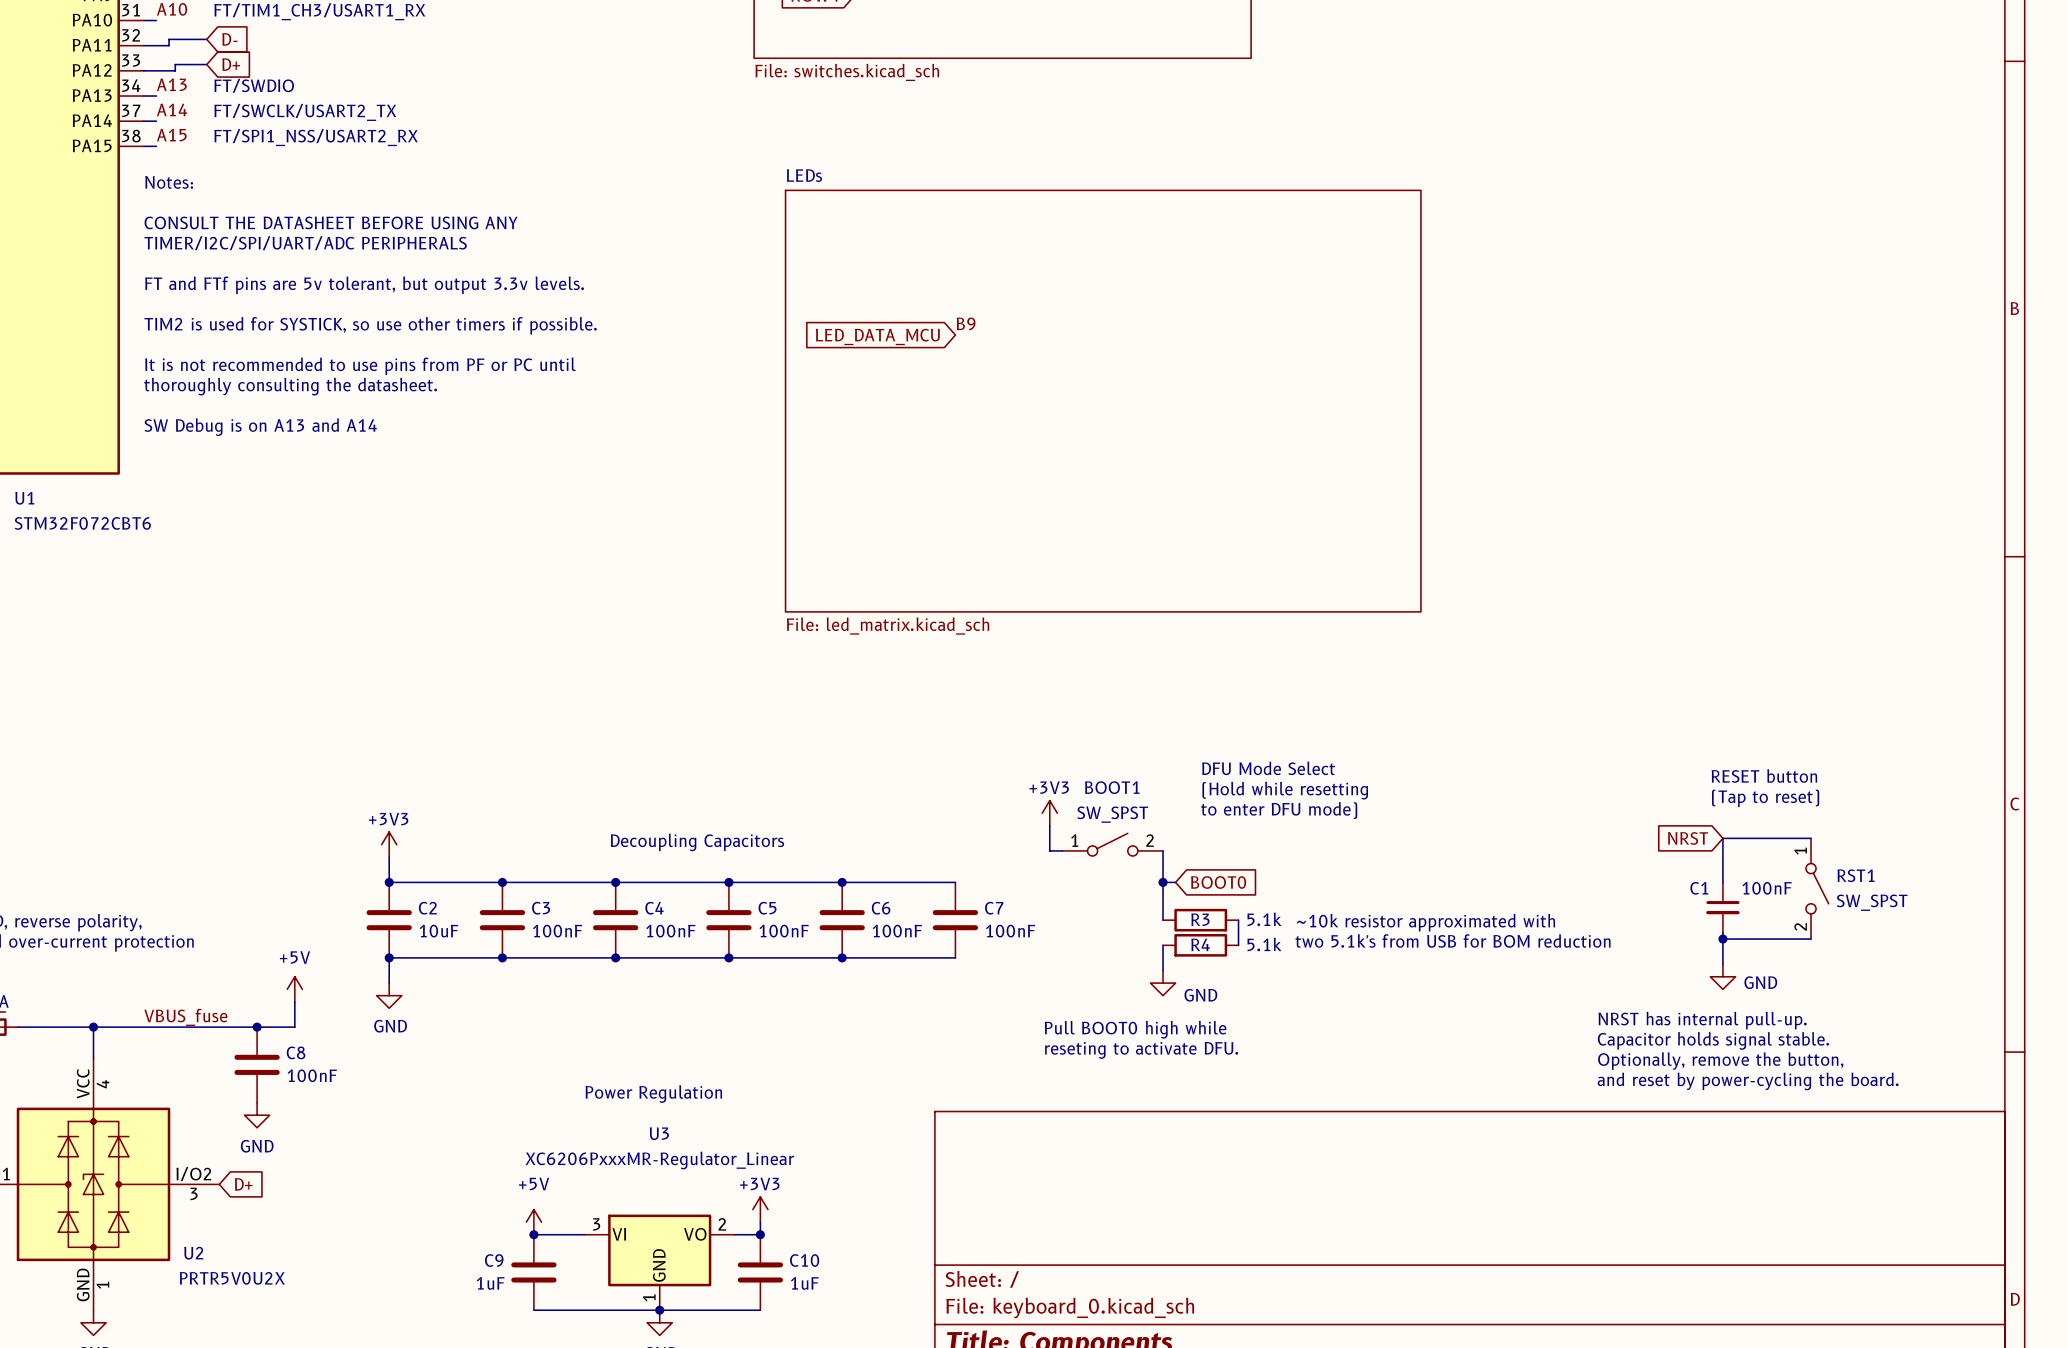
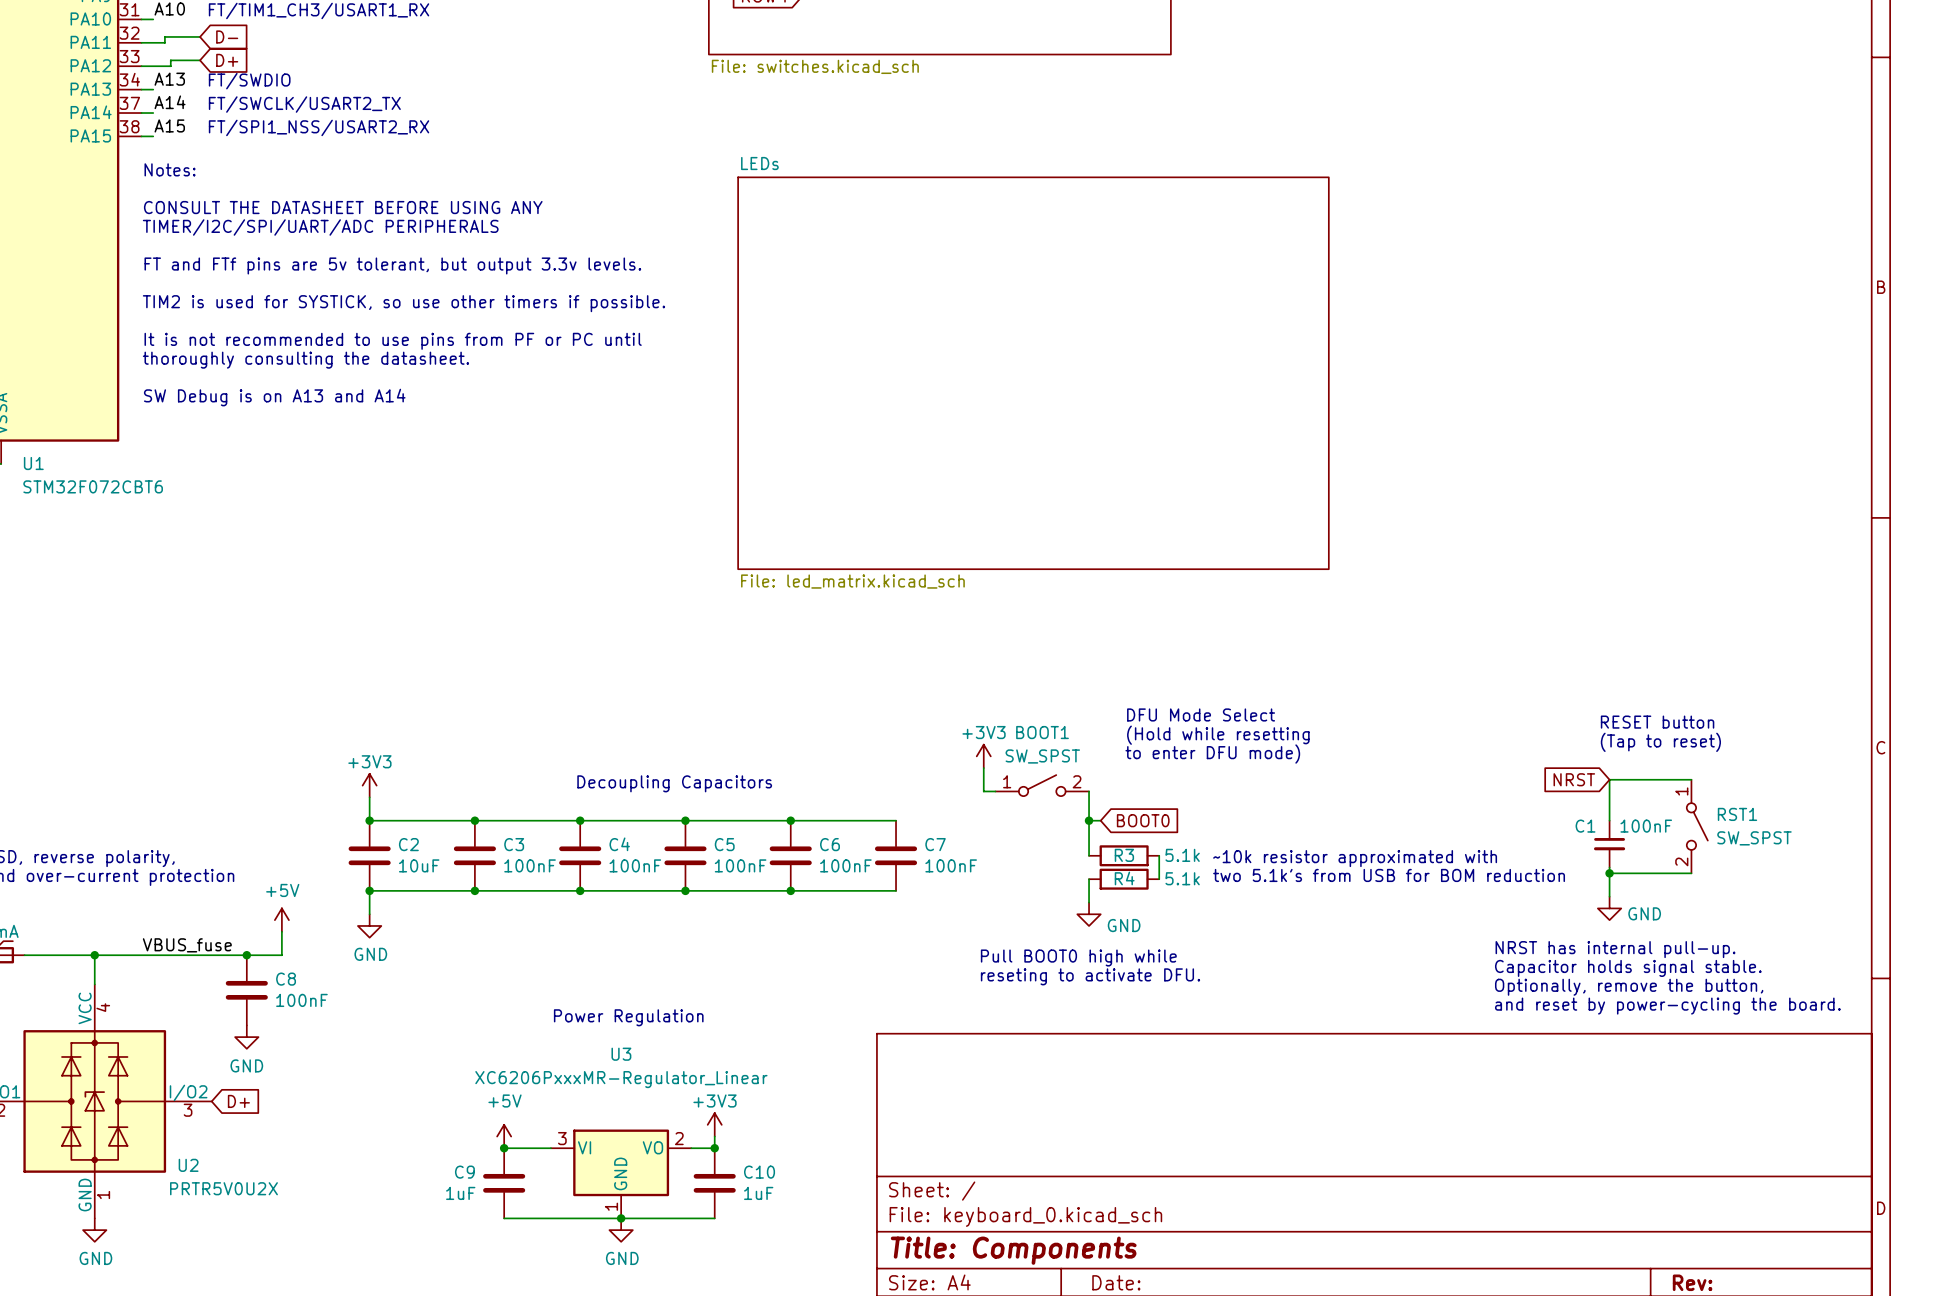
label: B9 (966, 323) -> none
global label: LED_DATA_MCU (877, 336) -> none

